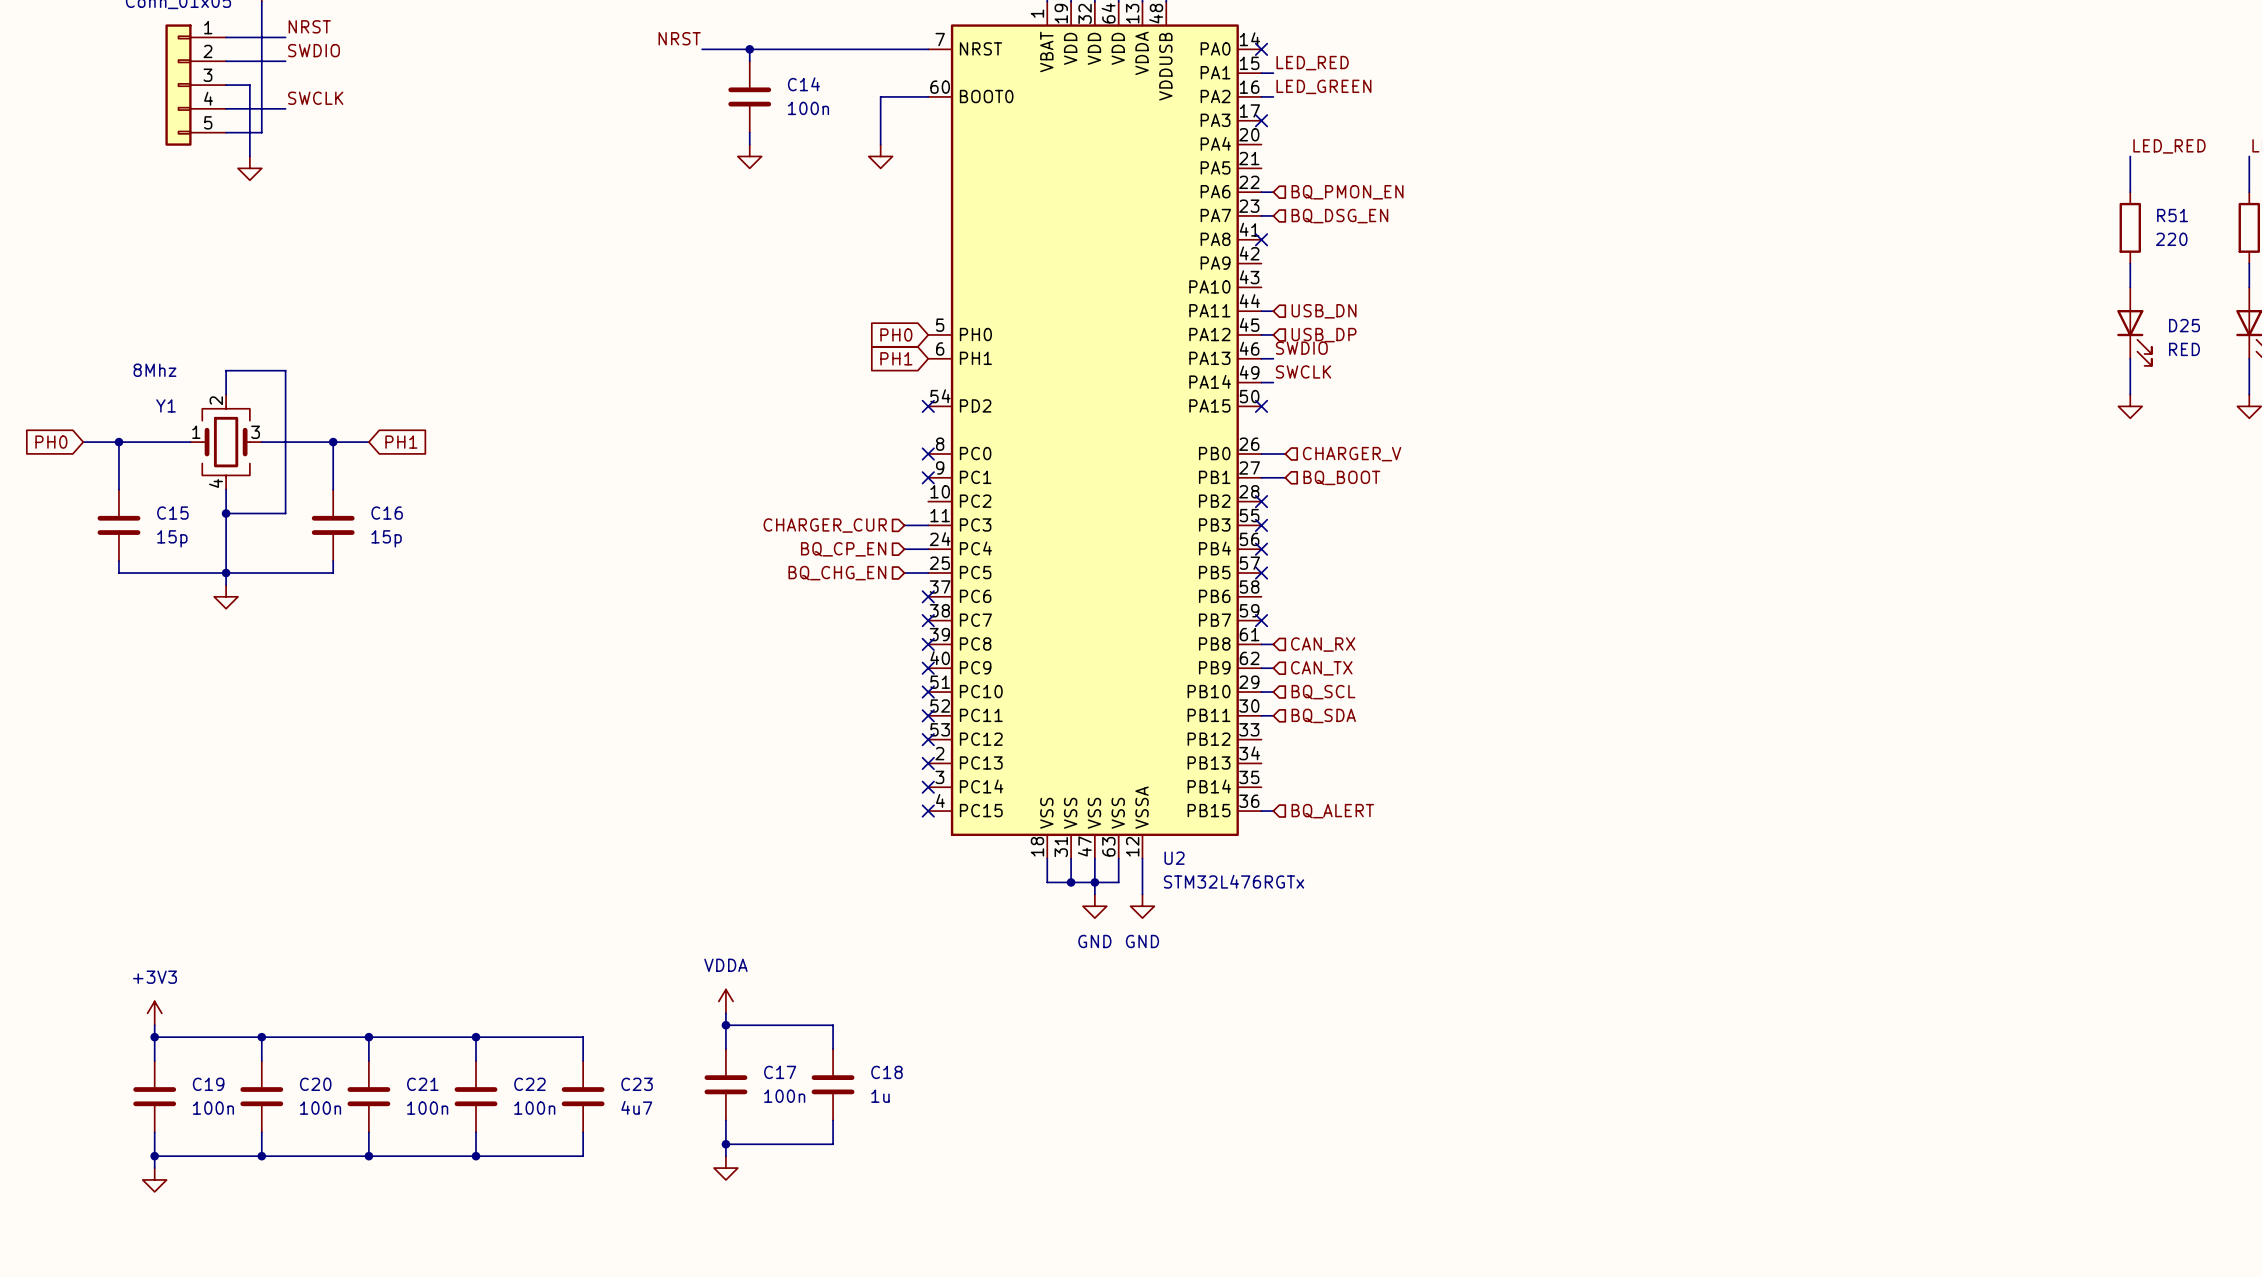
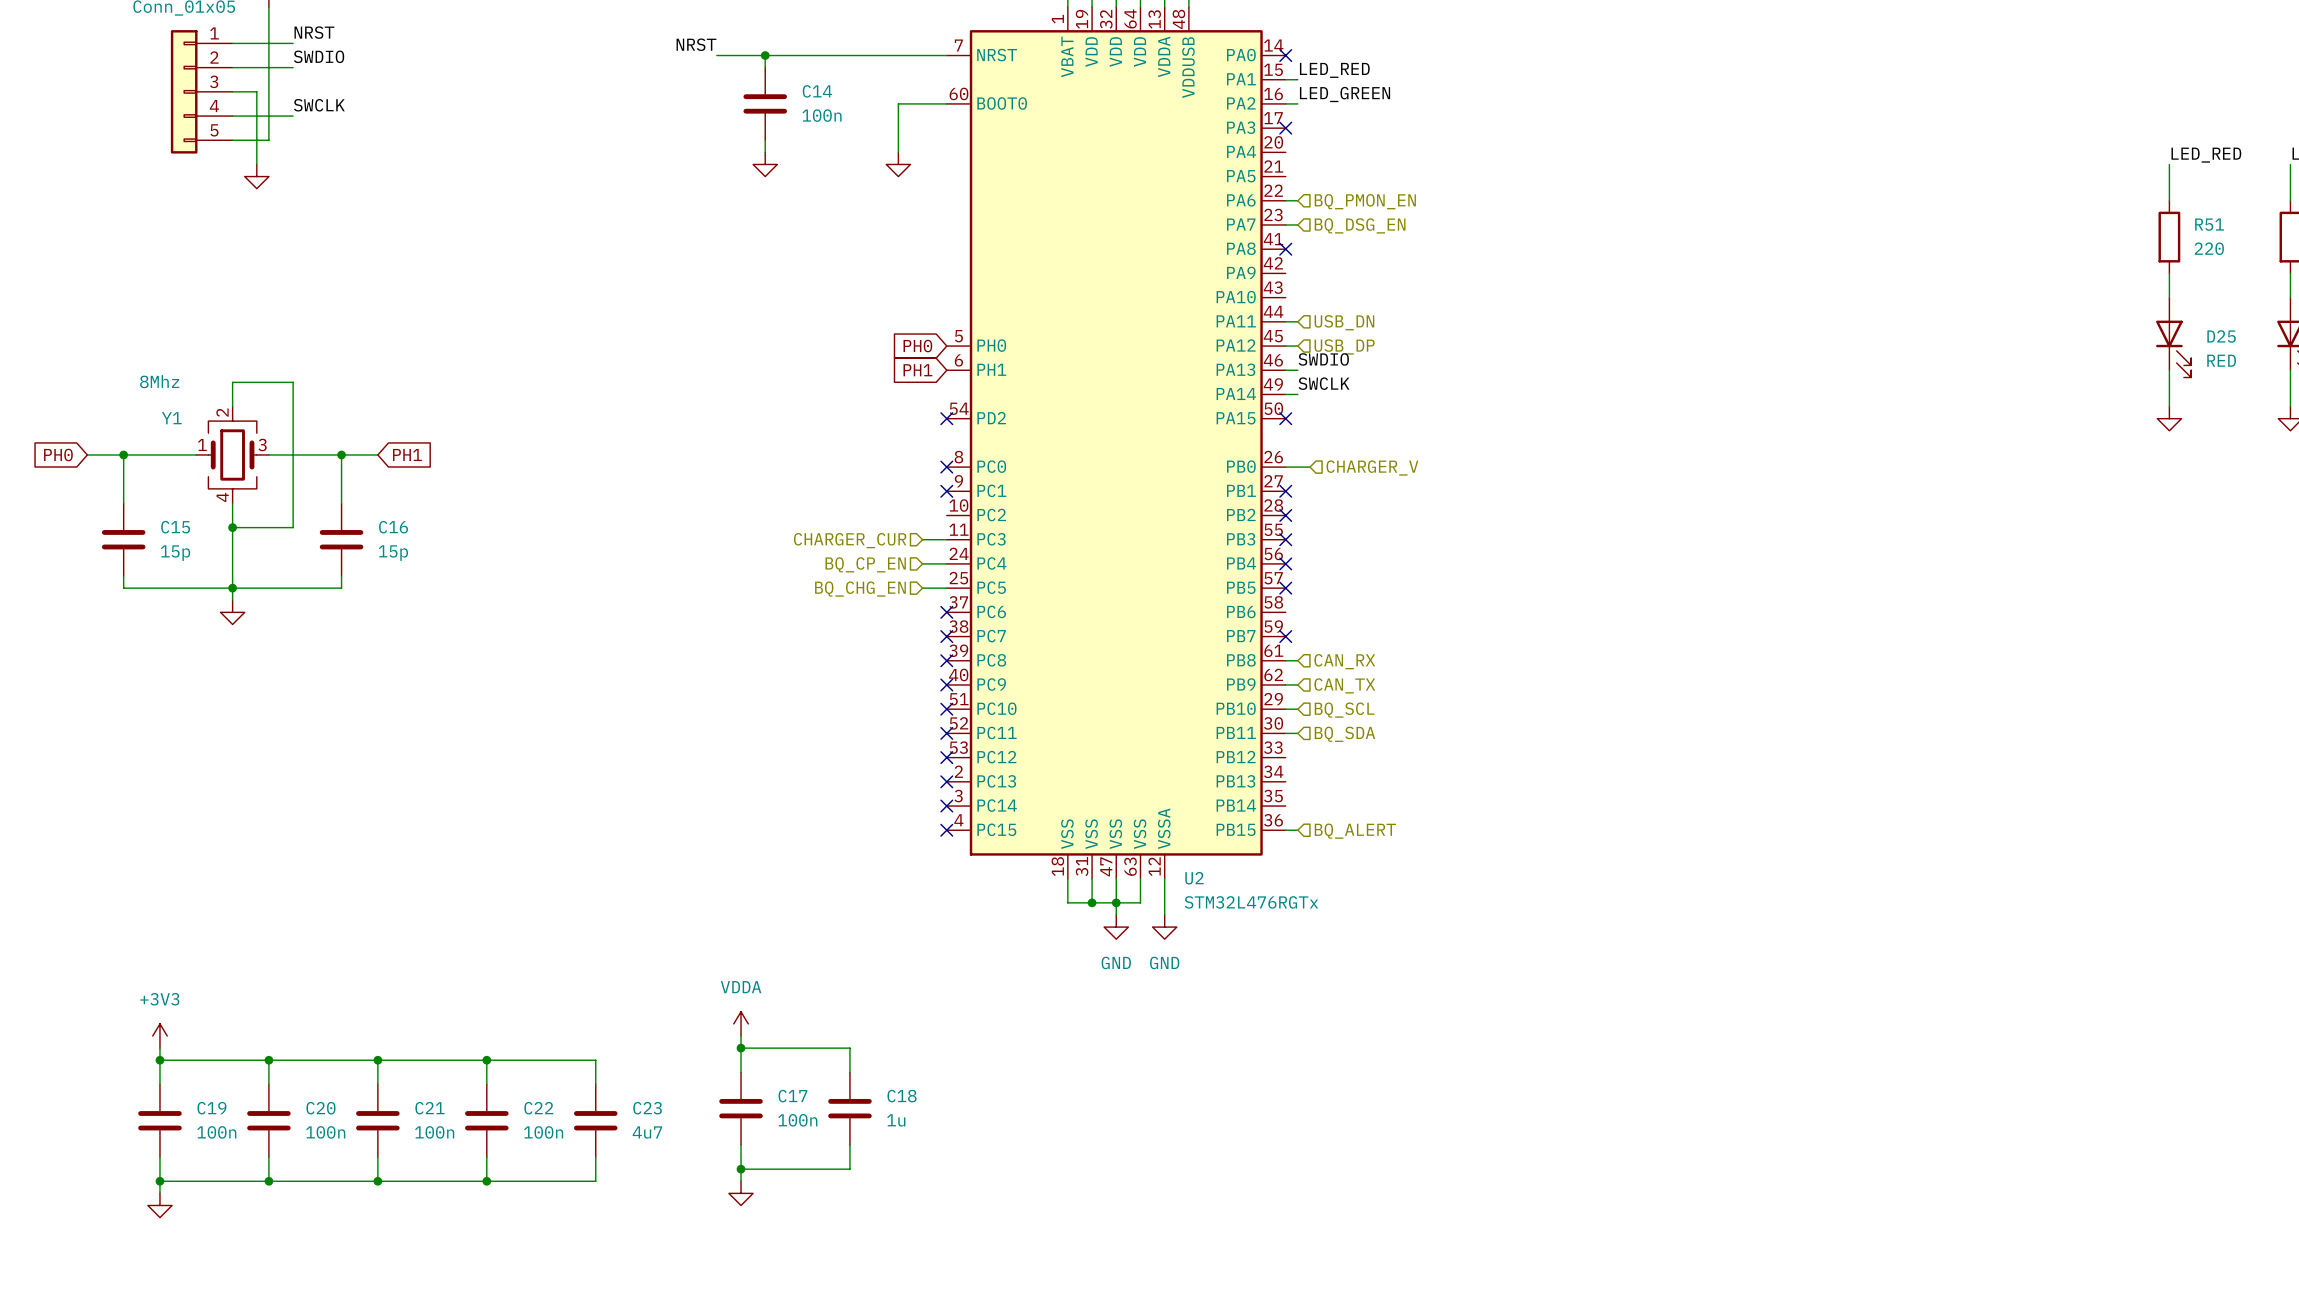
wire: (1261, 477) (1285, 477) -> none
no-connect mark: none -> (1285, 491)
hierarchical label: BQ_BOOT (1341, 477) -> none

